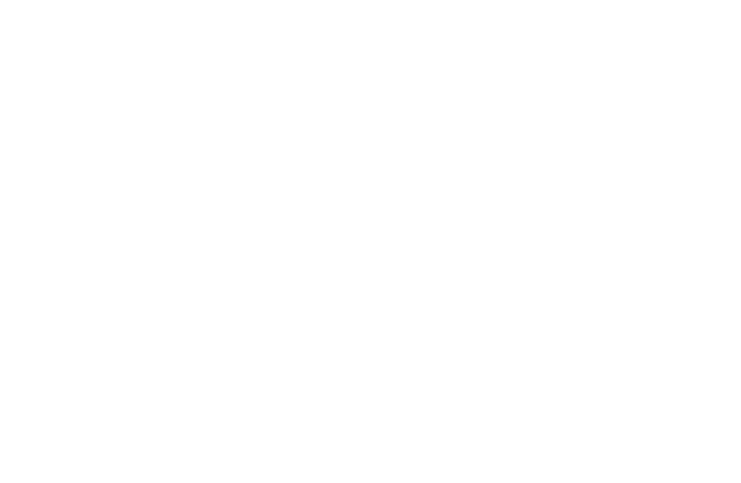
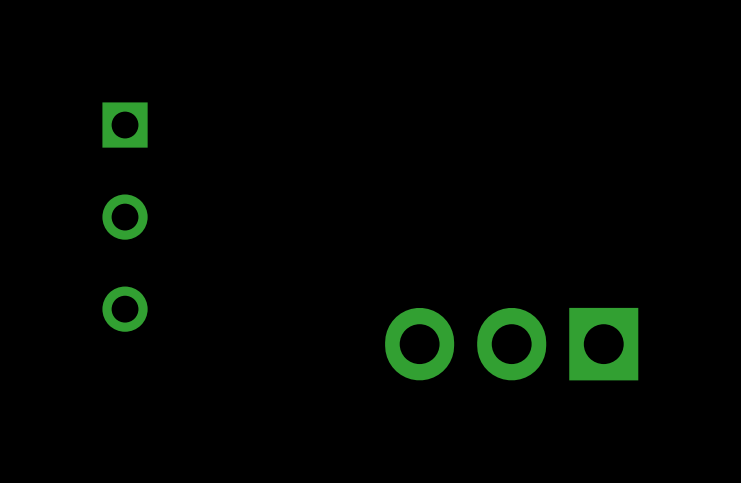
part: none -> (125, 217)
part: none -> (511, 344)

